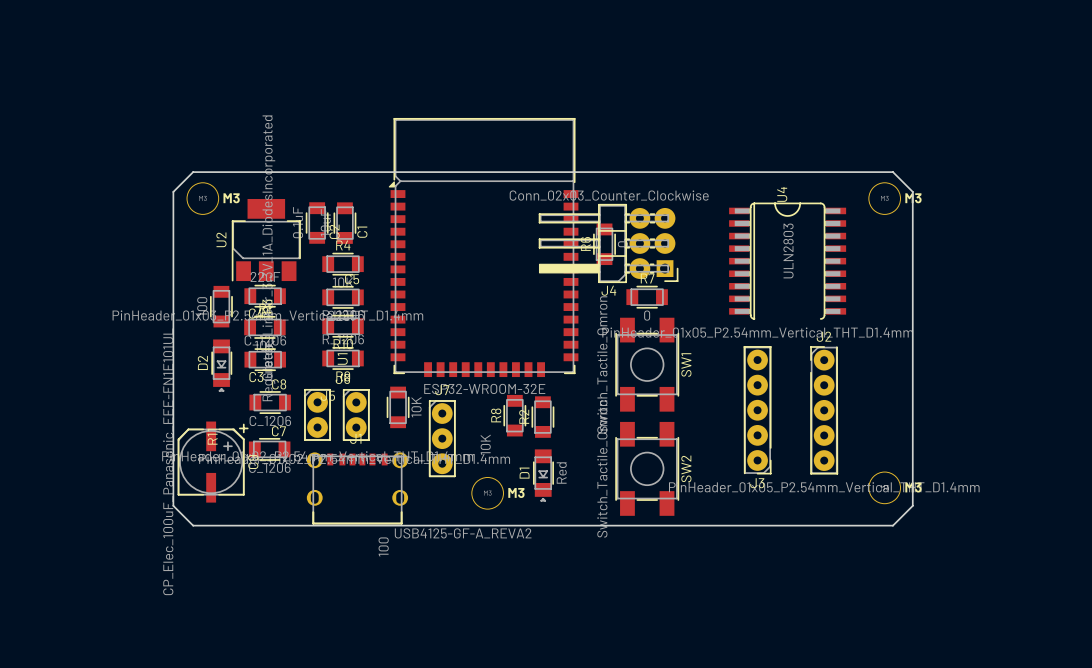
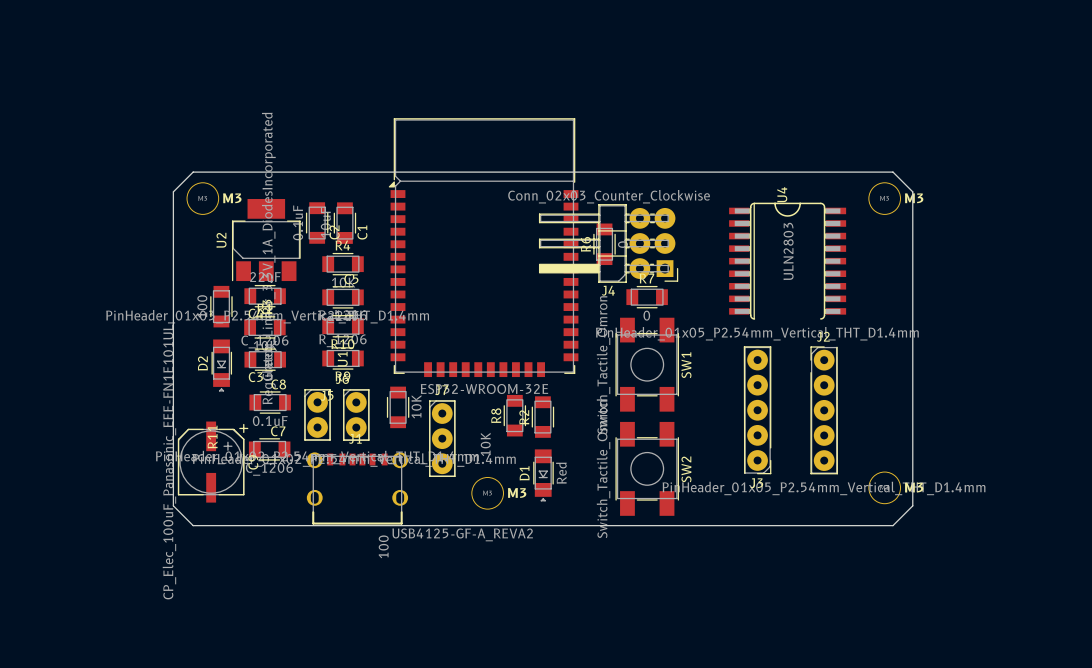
C8 value: C_1206 (270, 420) -> 0.1uF (270, 421)

